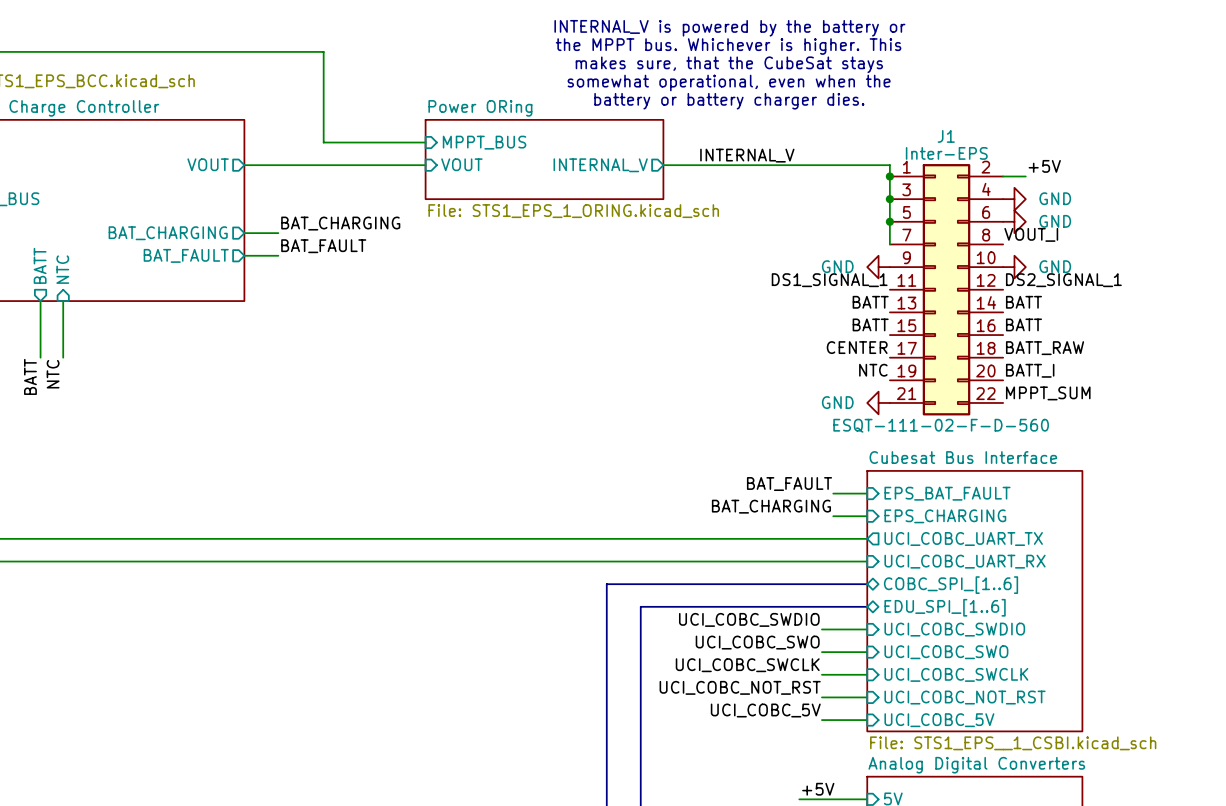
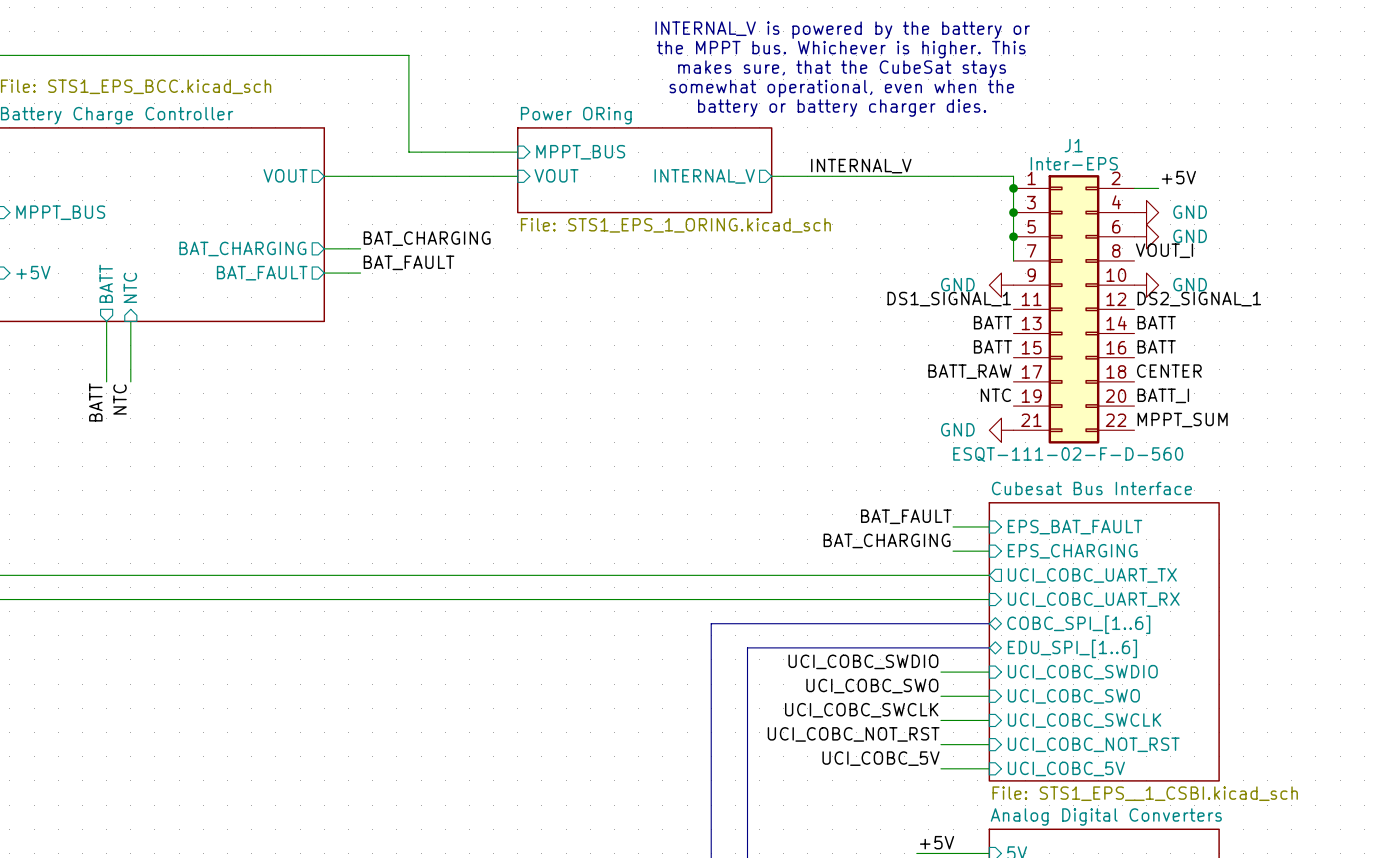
label: CENTER (857, 347) -> BATT_RAW (969, 371)
label: BATT_RAW (1045, 348) -> CENTER (1169, 371)

